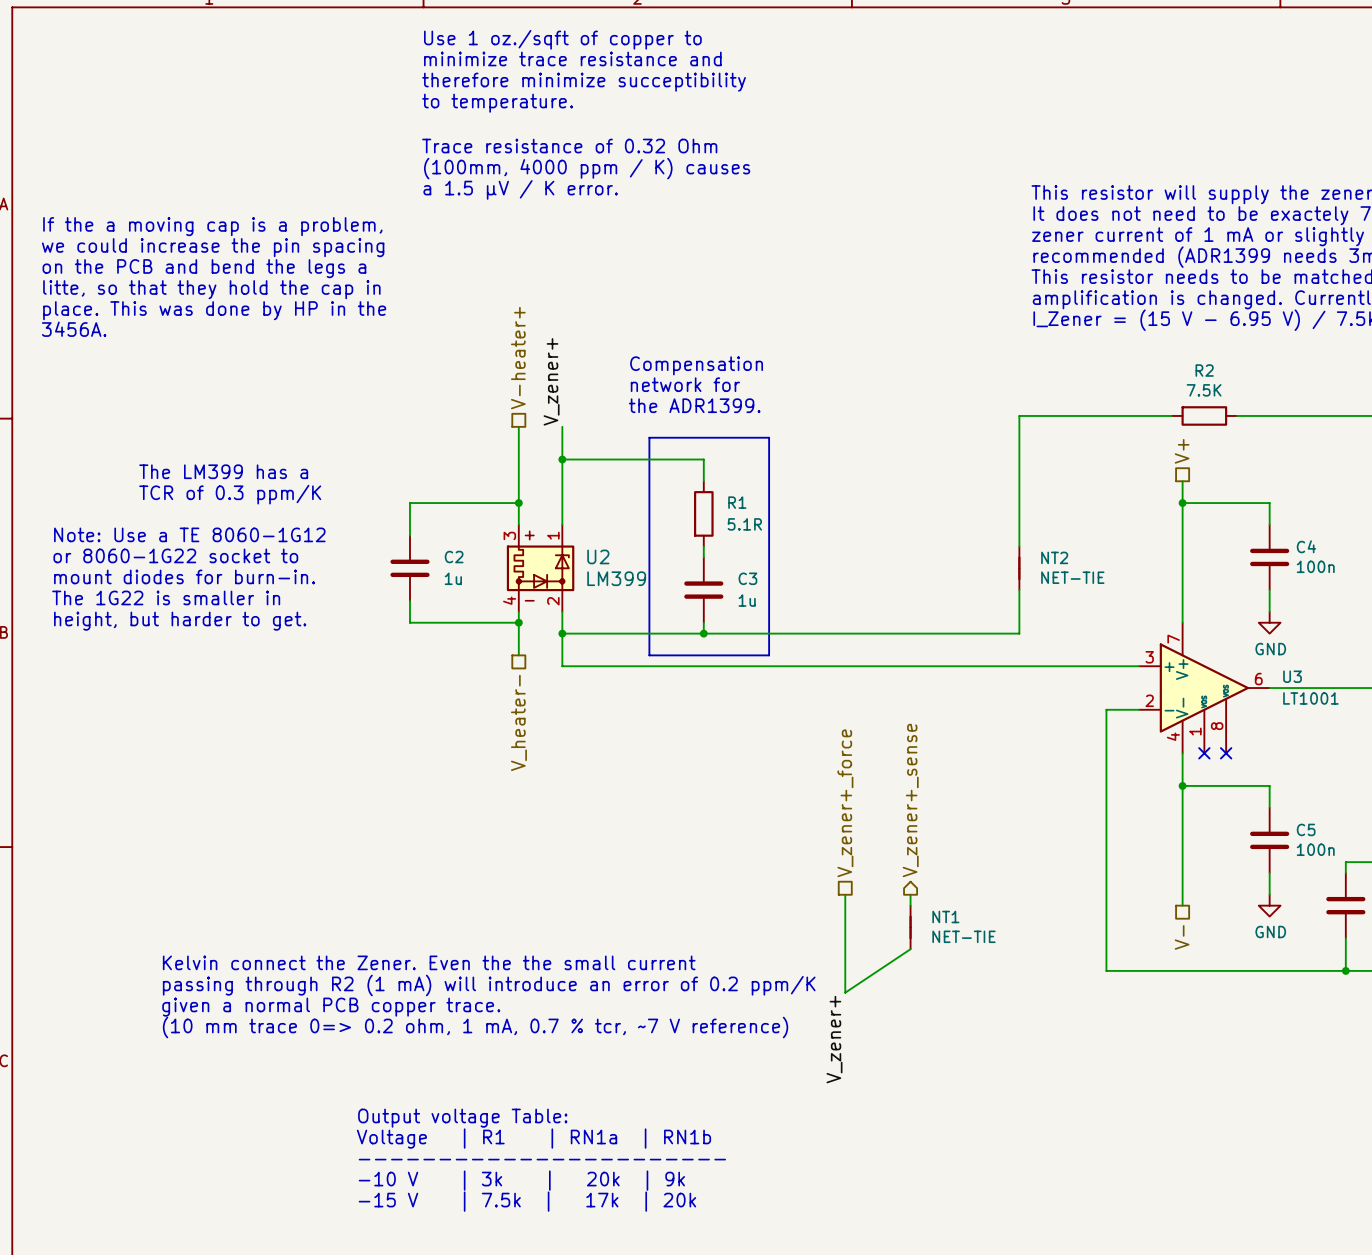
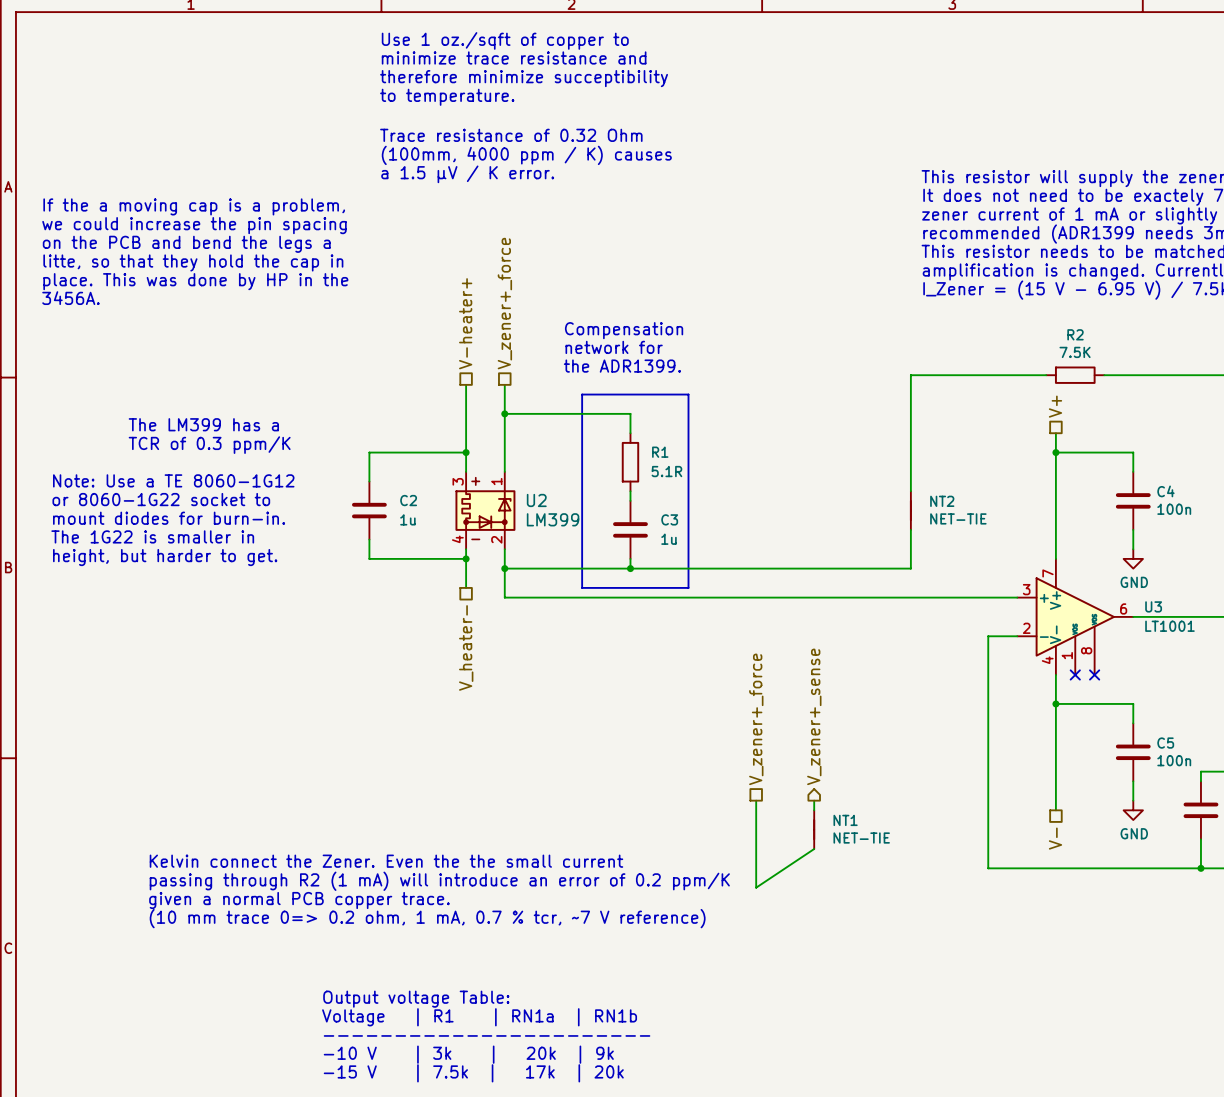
hierarchical label: none -> V_zener+_force (504, 303)
label: V_zener+ (551, 381) -> none
label: V_zener+ (834, 1039) -> none

